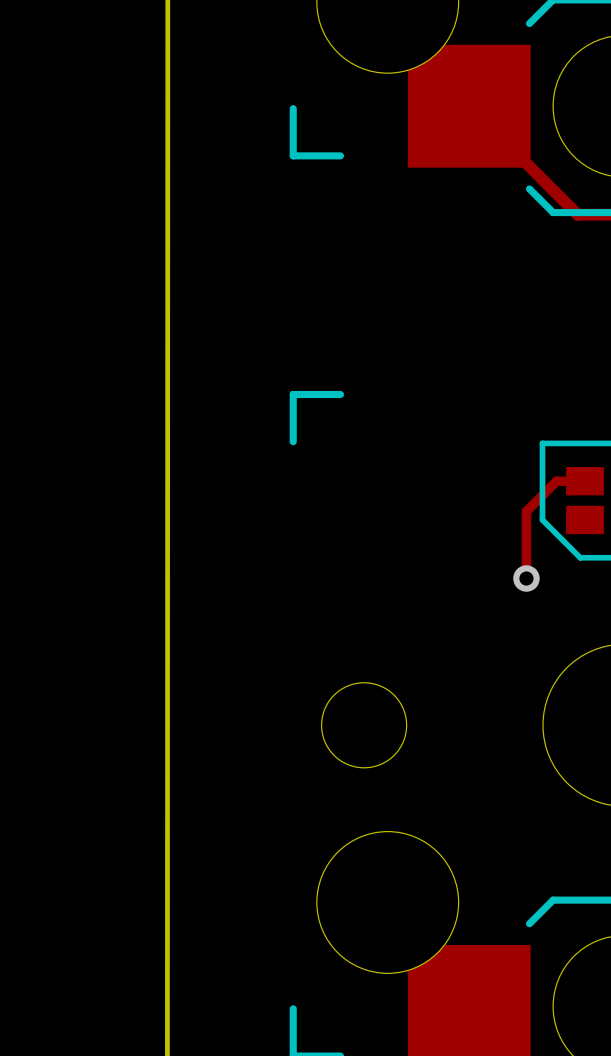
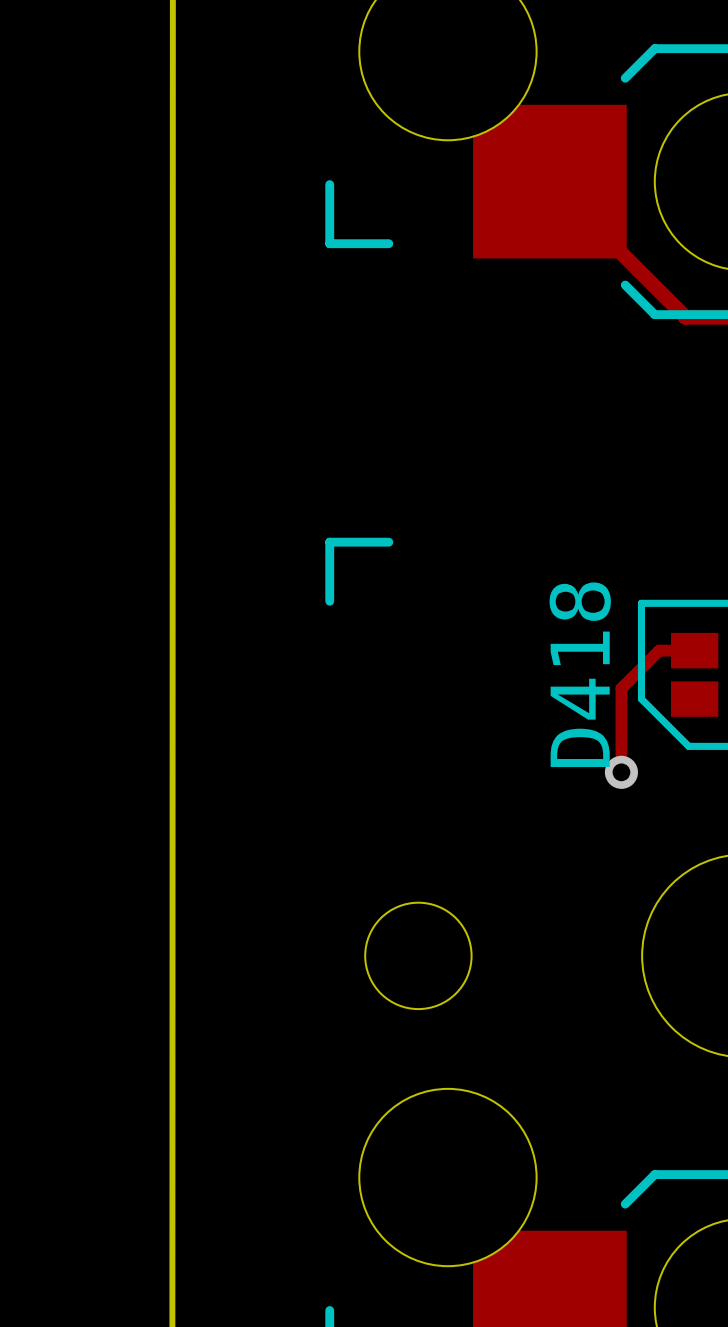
D418 name: none -> D418 (580, 674)

